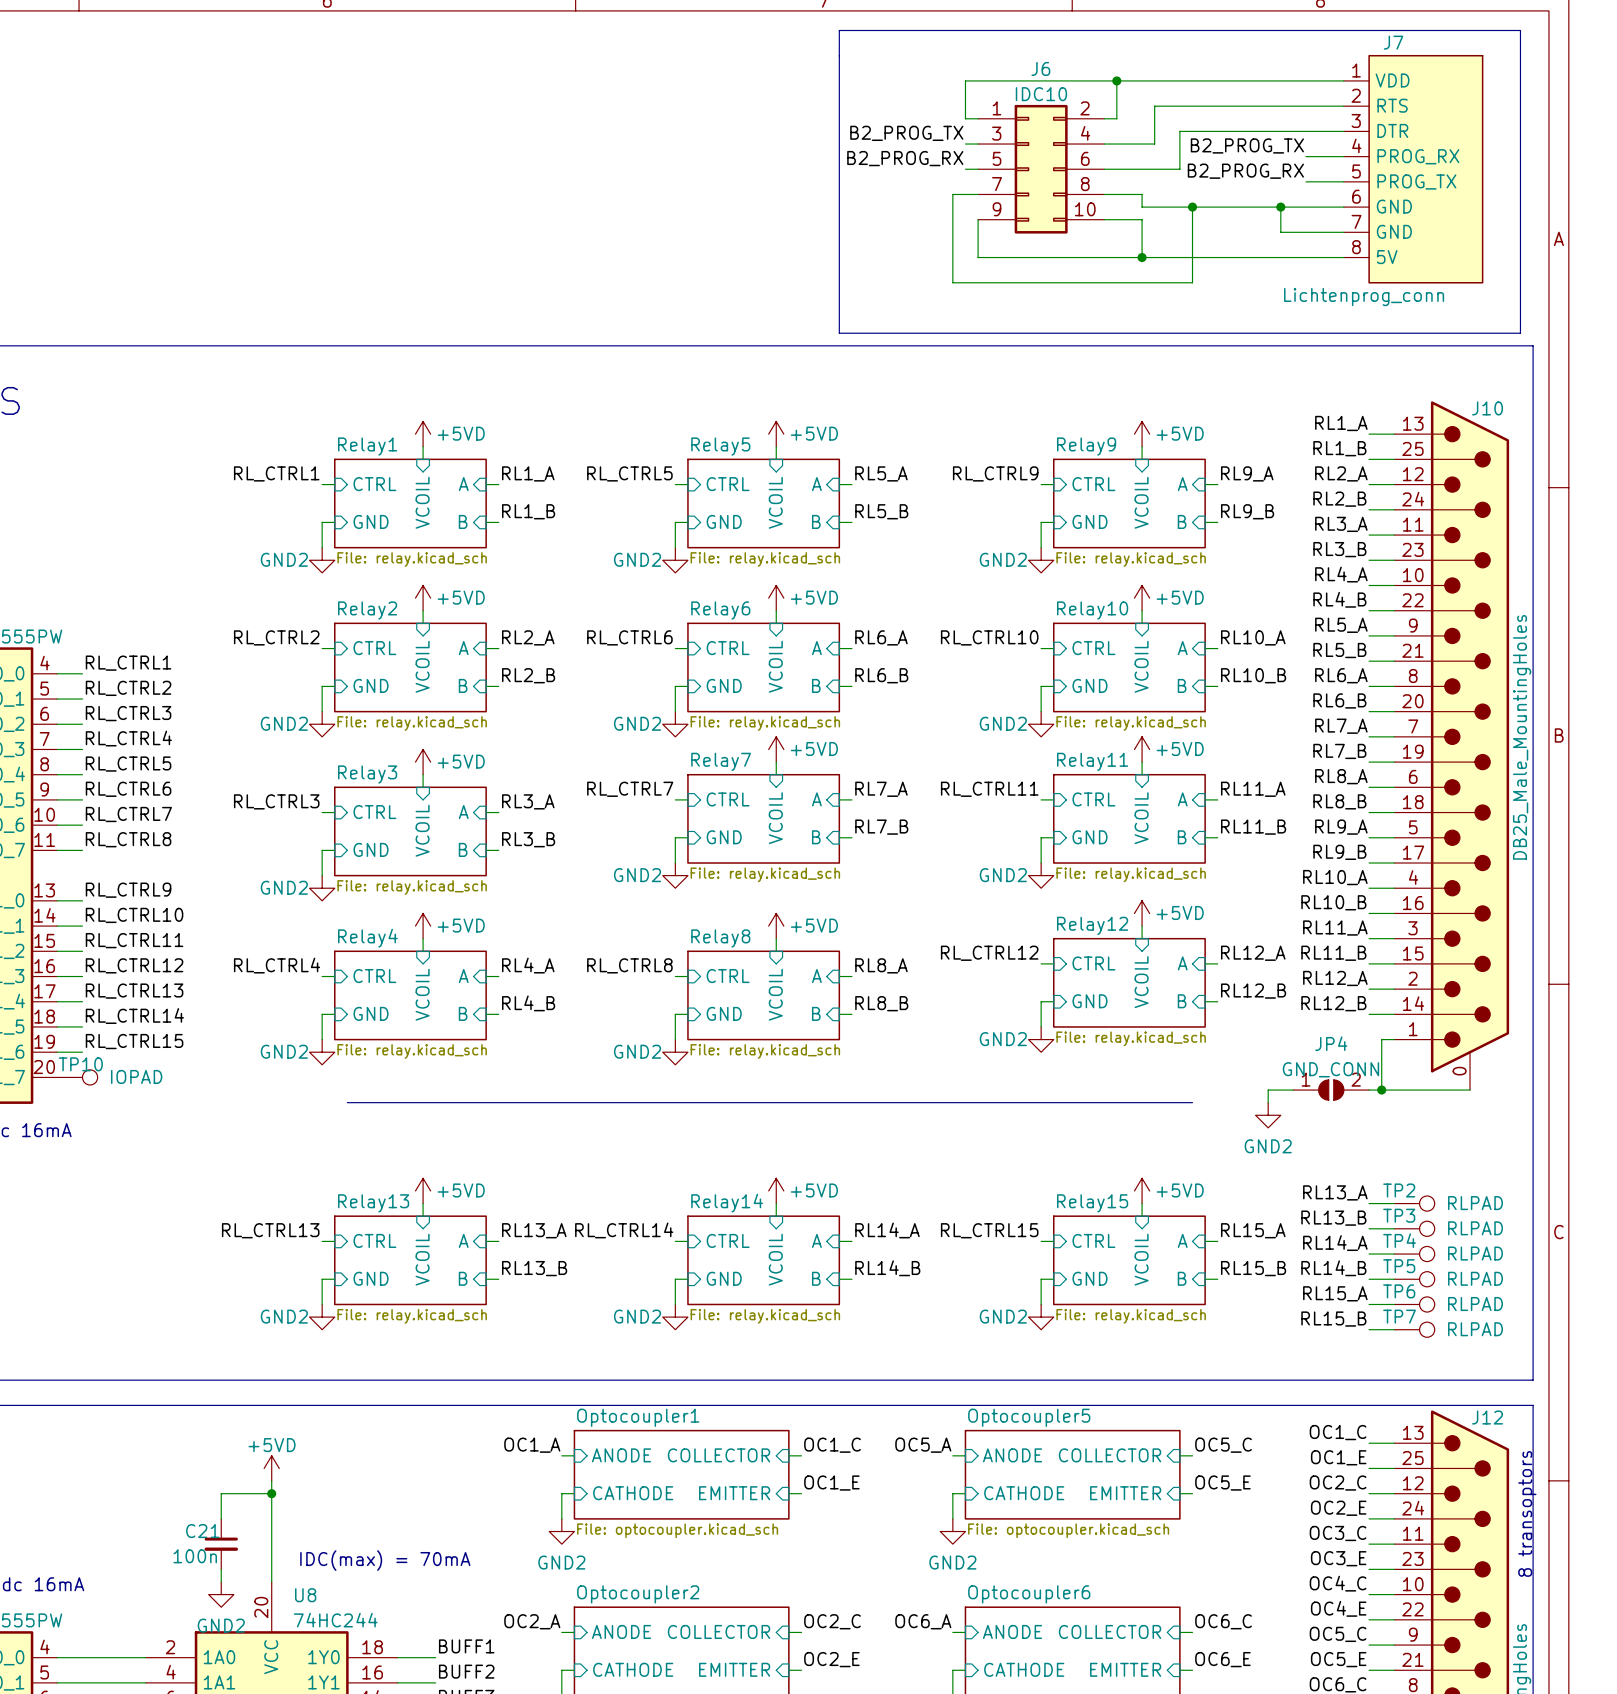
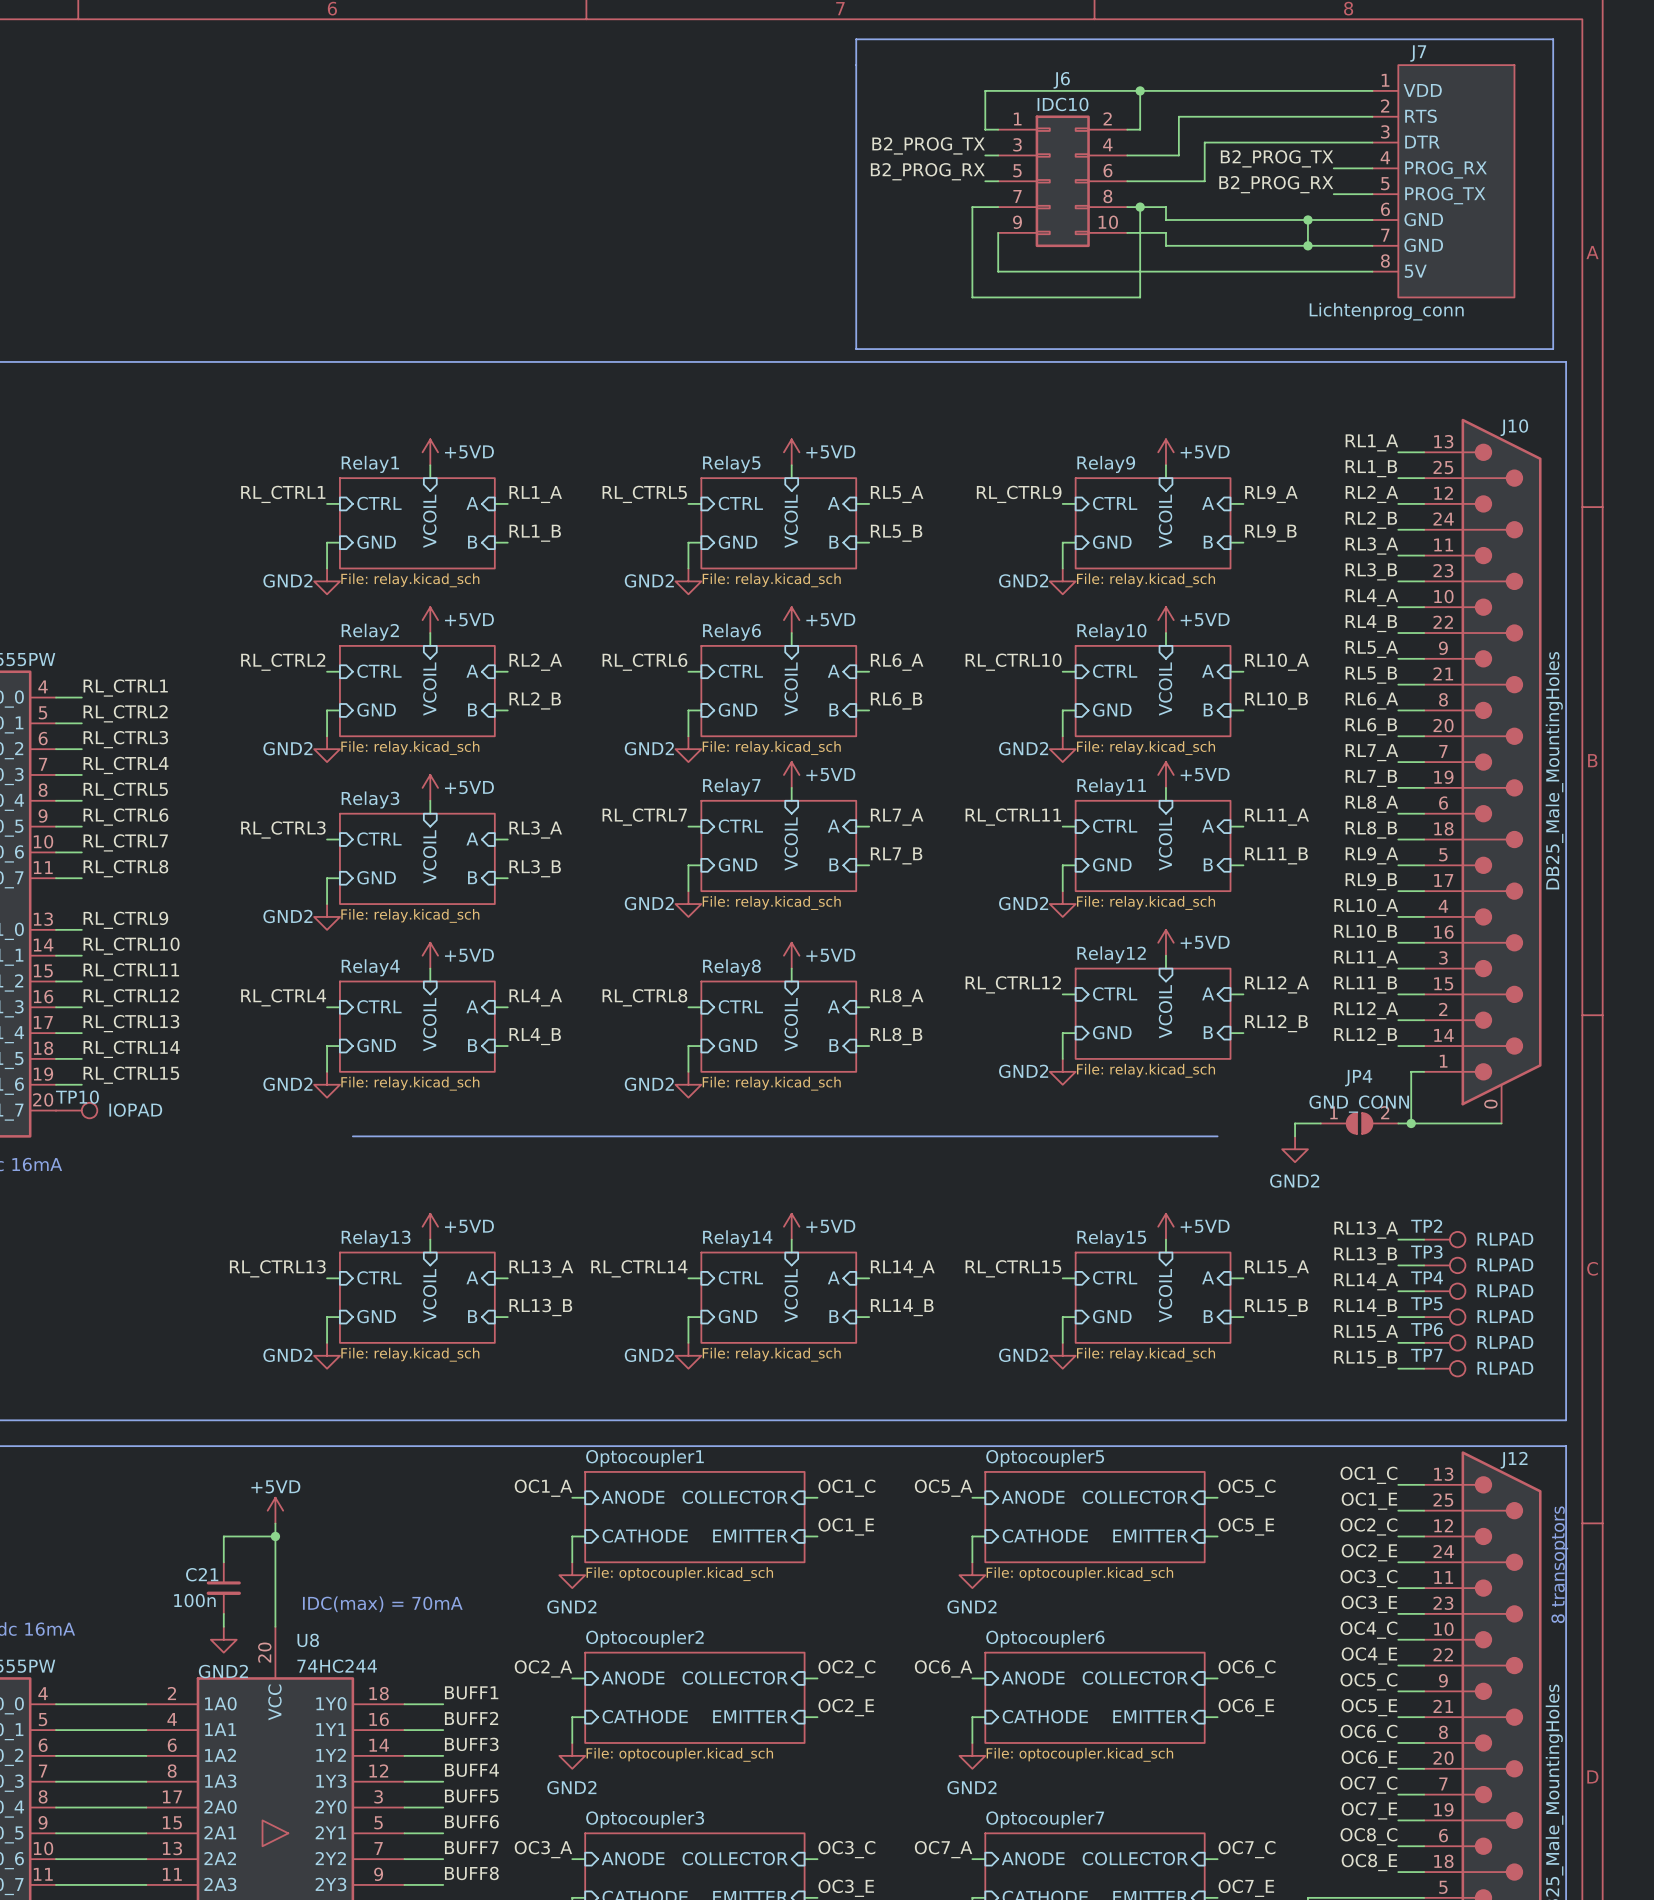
junction: none -> (1140, 207)
wire: (1192, 207) (1192, 282) (1116, 282) -> (1140, 207) (1140, 297)
junction: (1192, 207) -> none
wire: (1142, 232) (1142, 257) -> (1165, 245) (1307, 245)
junction: none -> (1307, 245)
junction: (1142, 257) -> none

